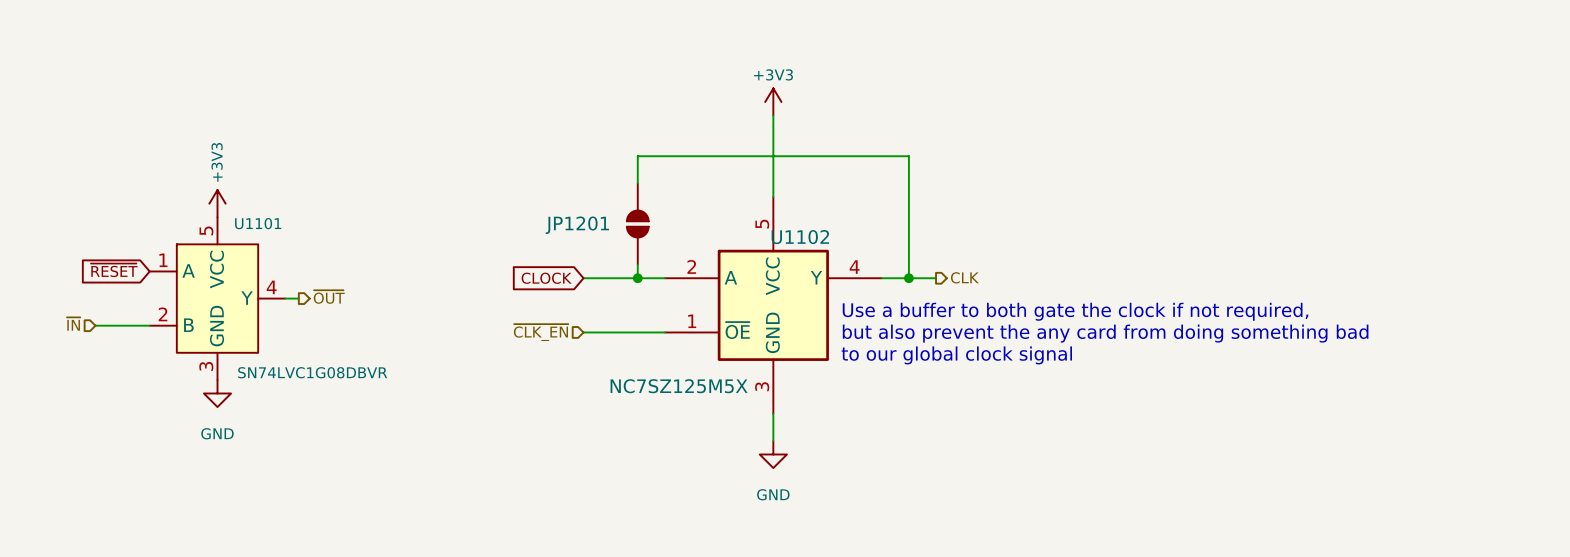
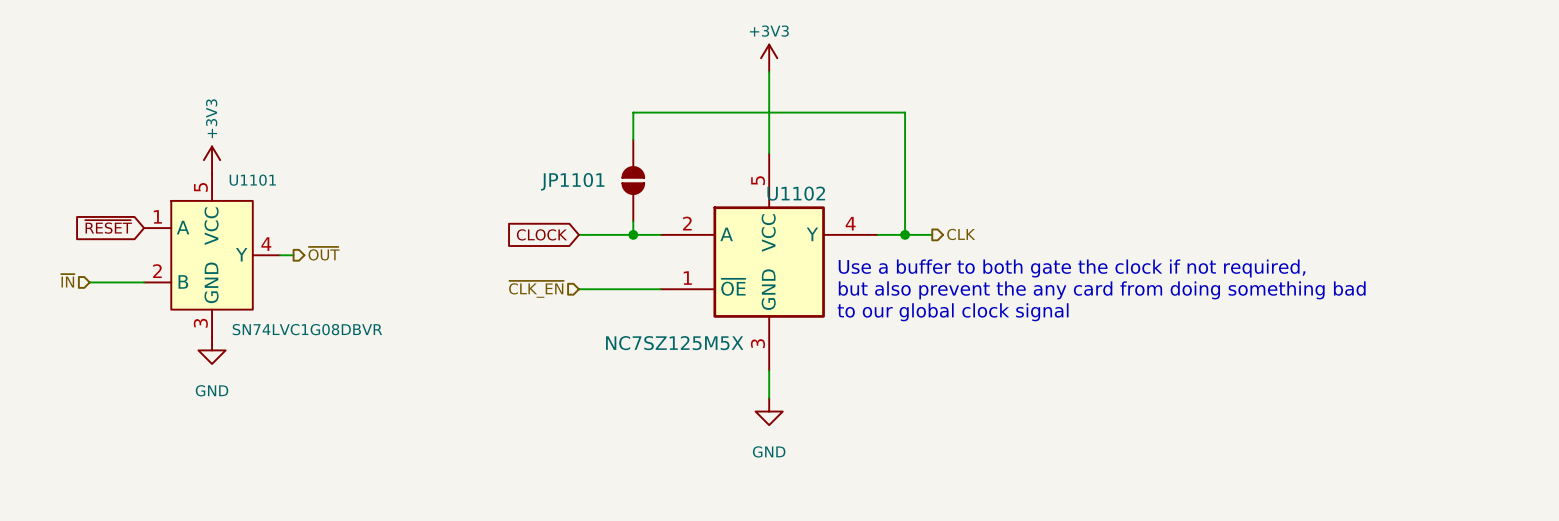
JP1201 name: JP1201 (577, 225) -> JP1101 (572, 181)

